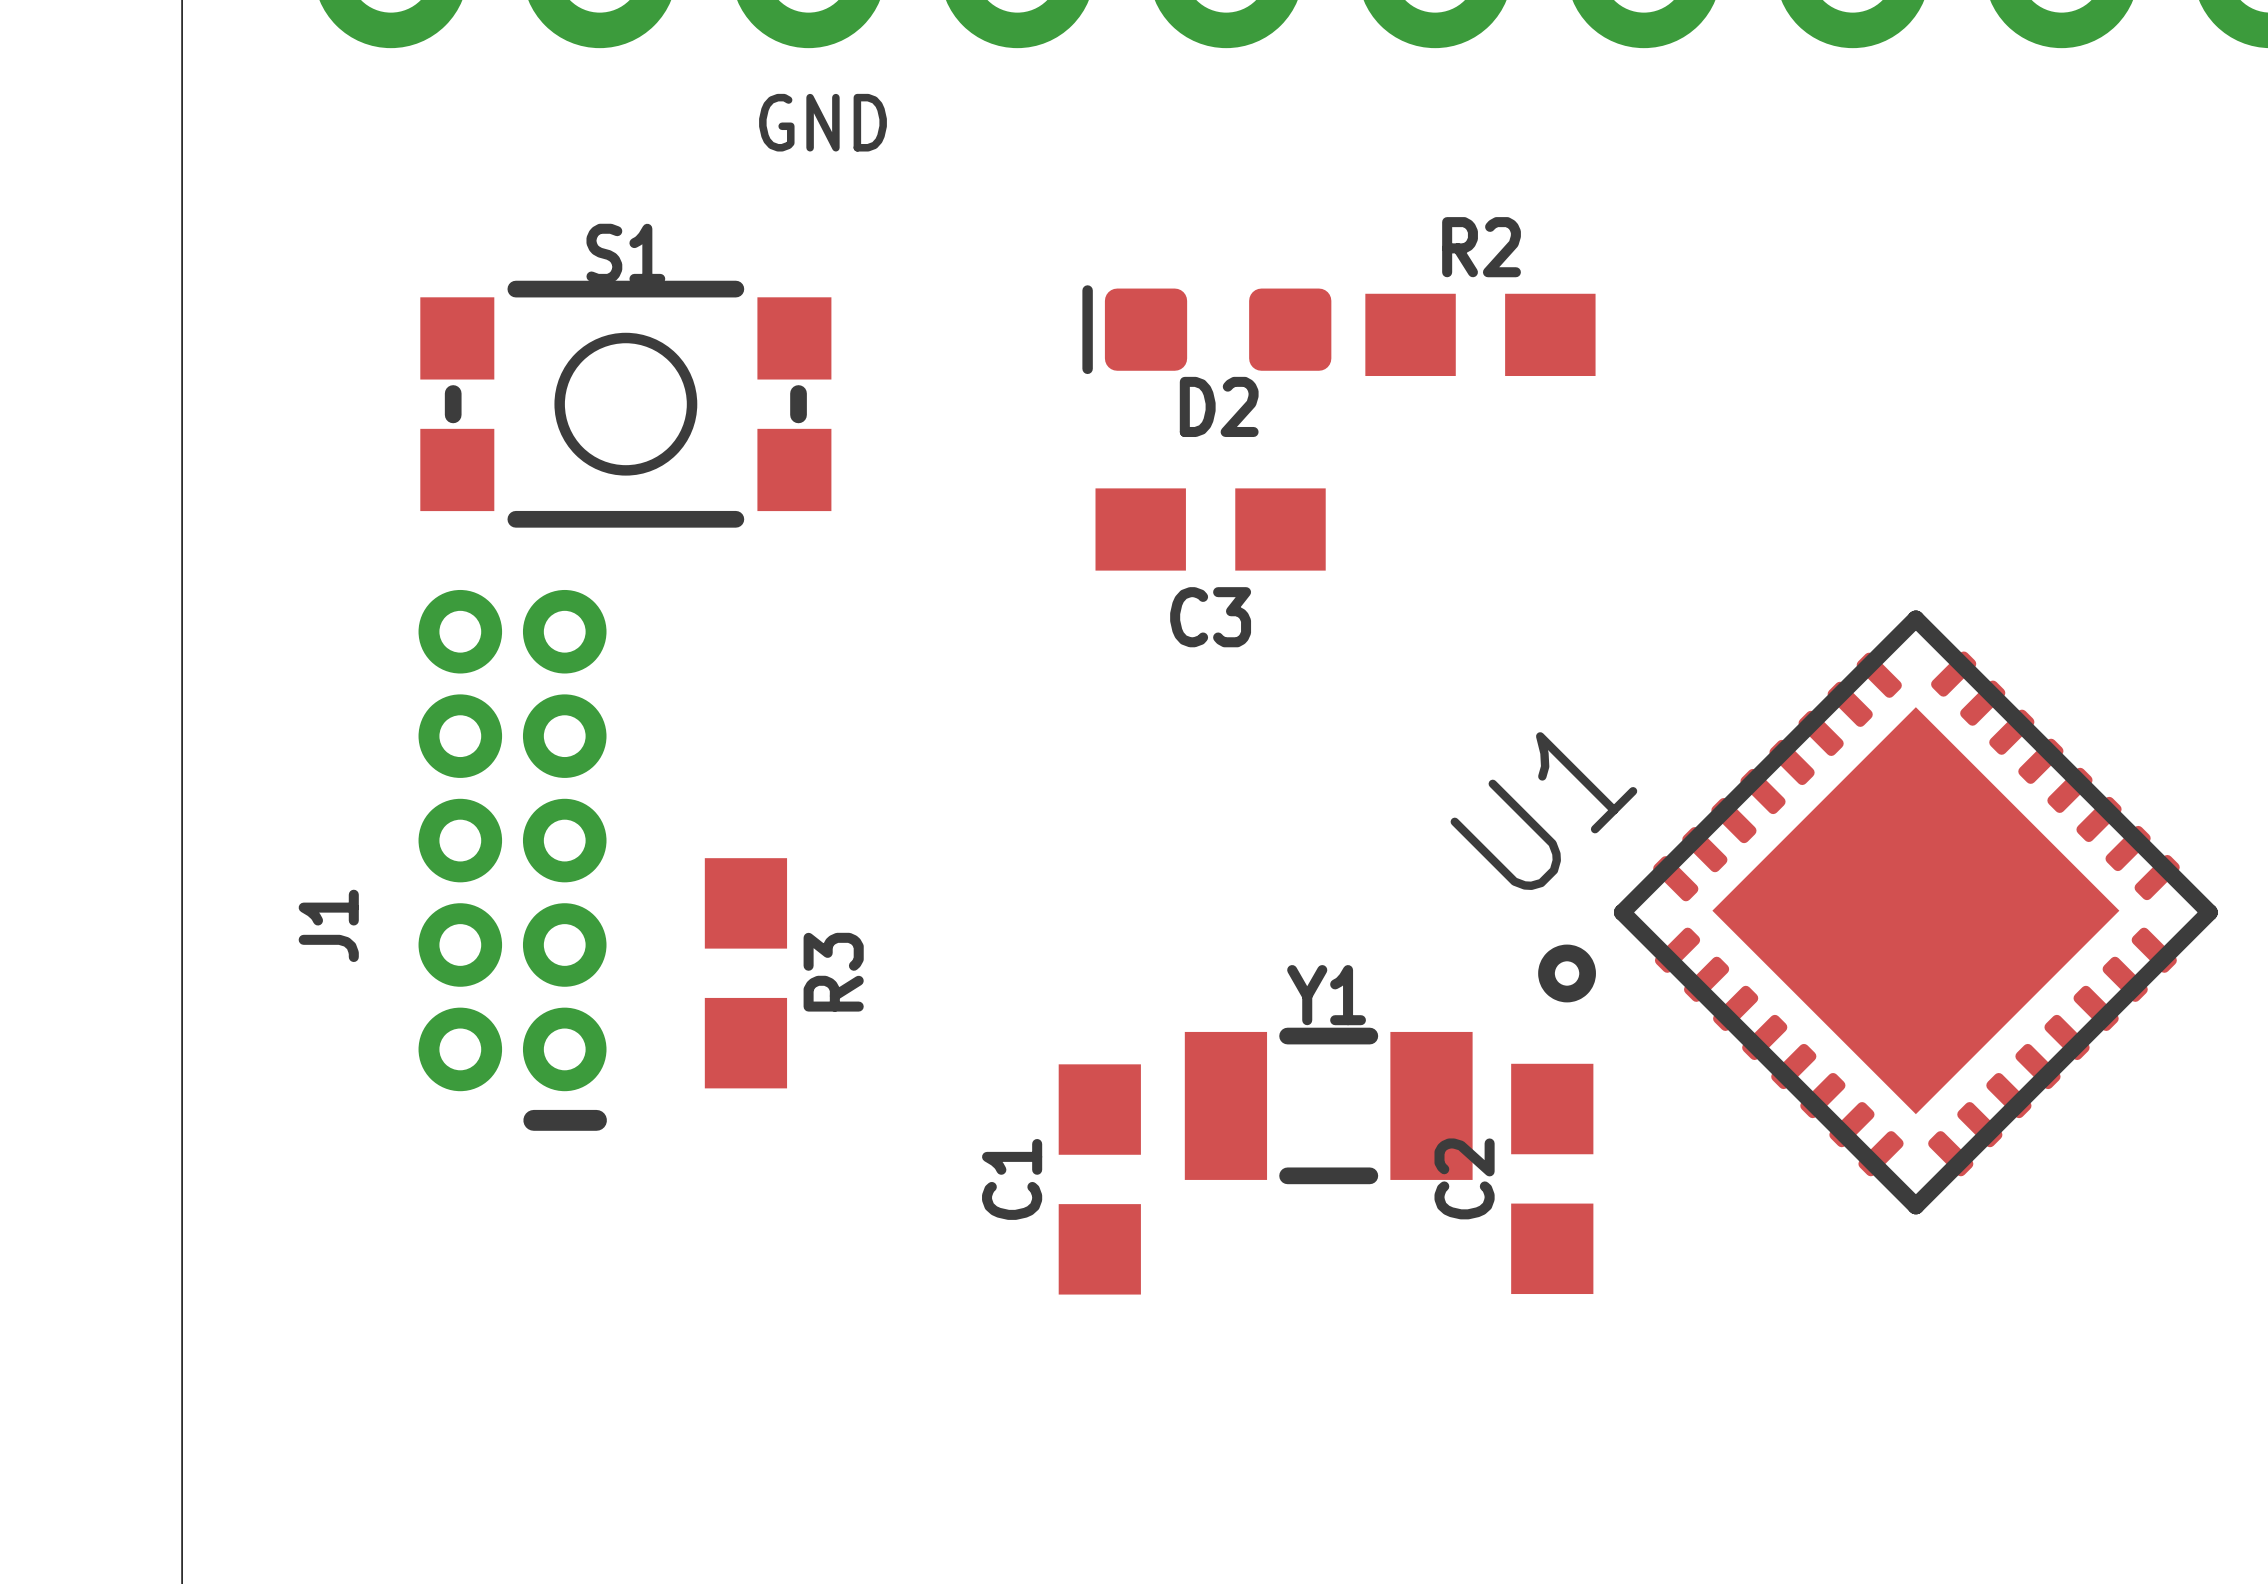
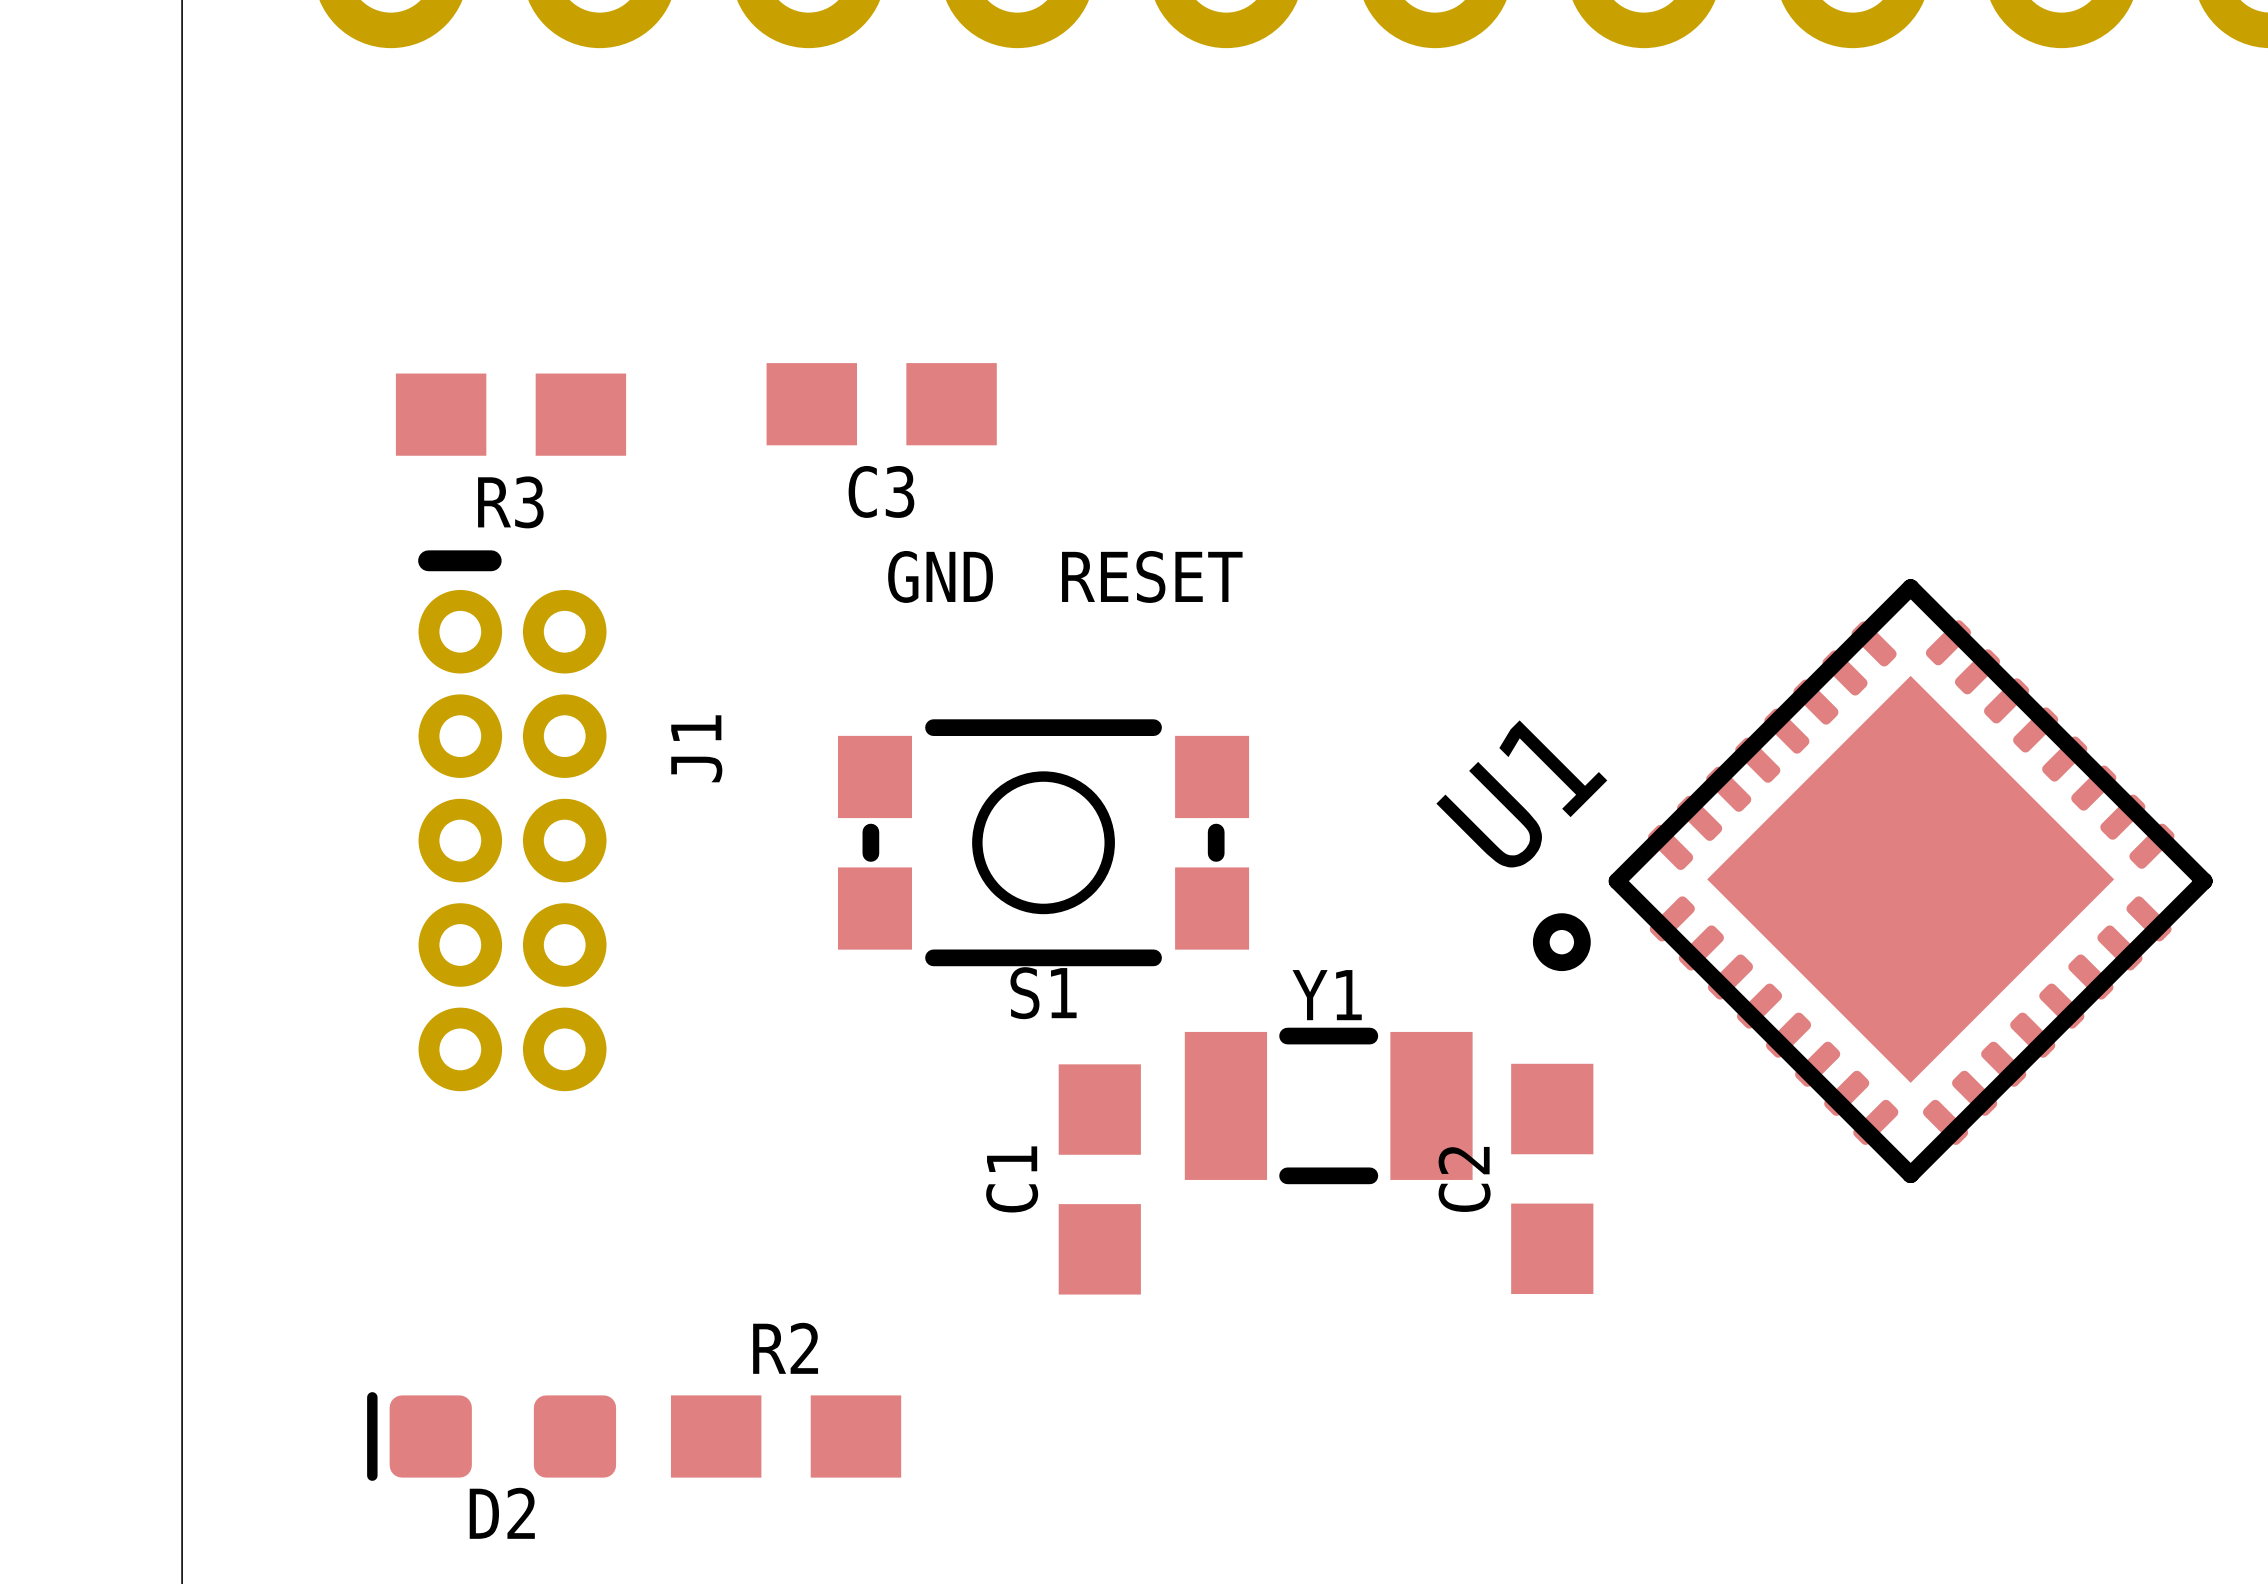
text position: GND (822, 122) -> GND (940, 576)
S1 name position: S1 (625, 253) -> S1 (1043, 993)
D2 position: (1206, 329) -> (491, 1436)
R2 position: (1480, 334) -> (786, 1436)
S1 position: (625, 404) -> (1043, 842)
C3 position: (1210, 529) -> (881, 404)
text: none -> RESET (1152, 576)
J1 rotation: 0° (512, 860) -> 180° (512, 820)
U1 position: (1877, 912) -> (1872, 881)
R3 rotation: 0° (745, 973) -> 90° clockwise (511, 414)
R3 position: (745, 973) -> (511, 414)

